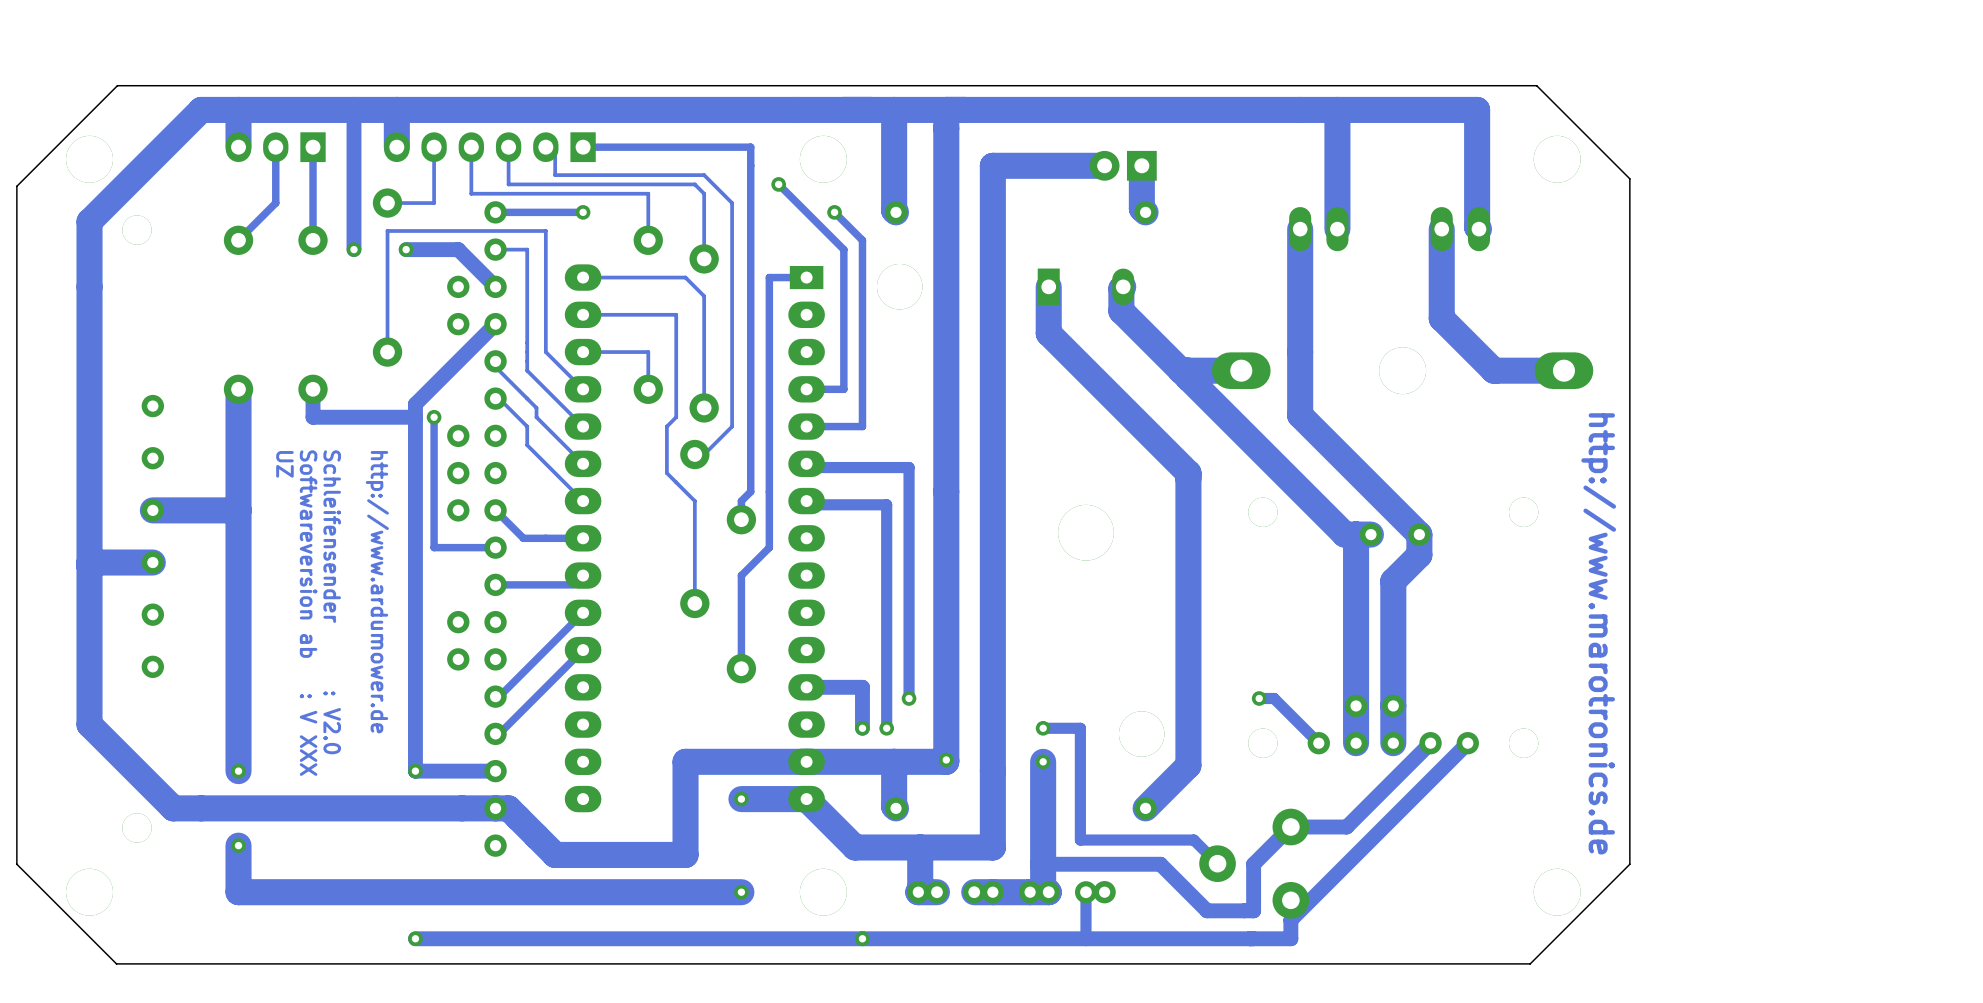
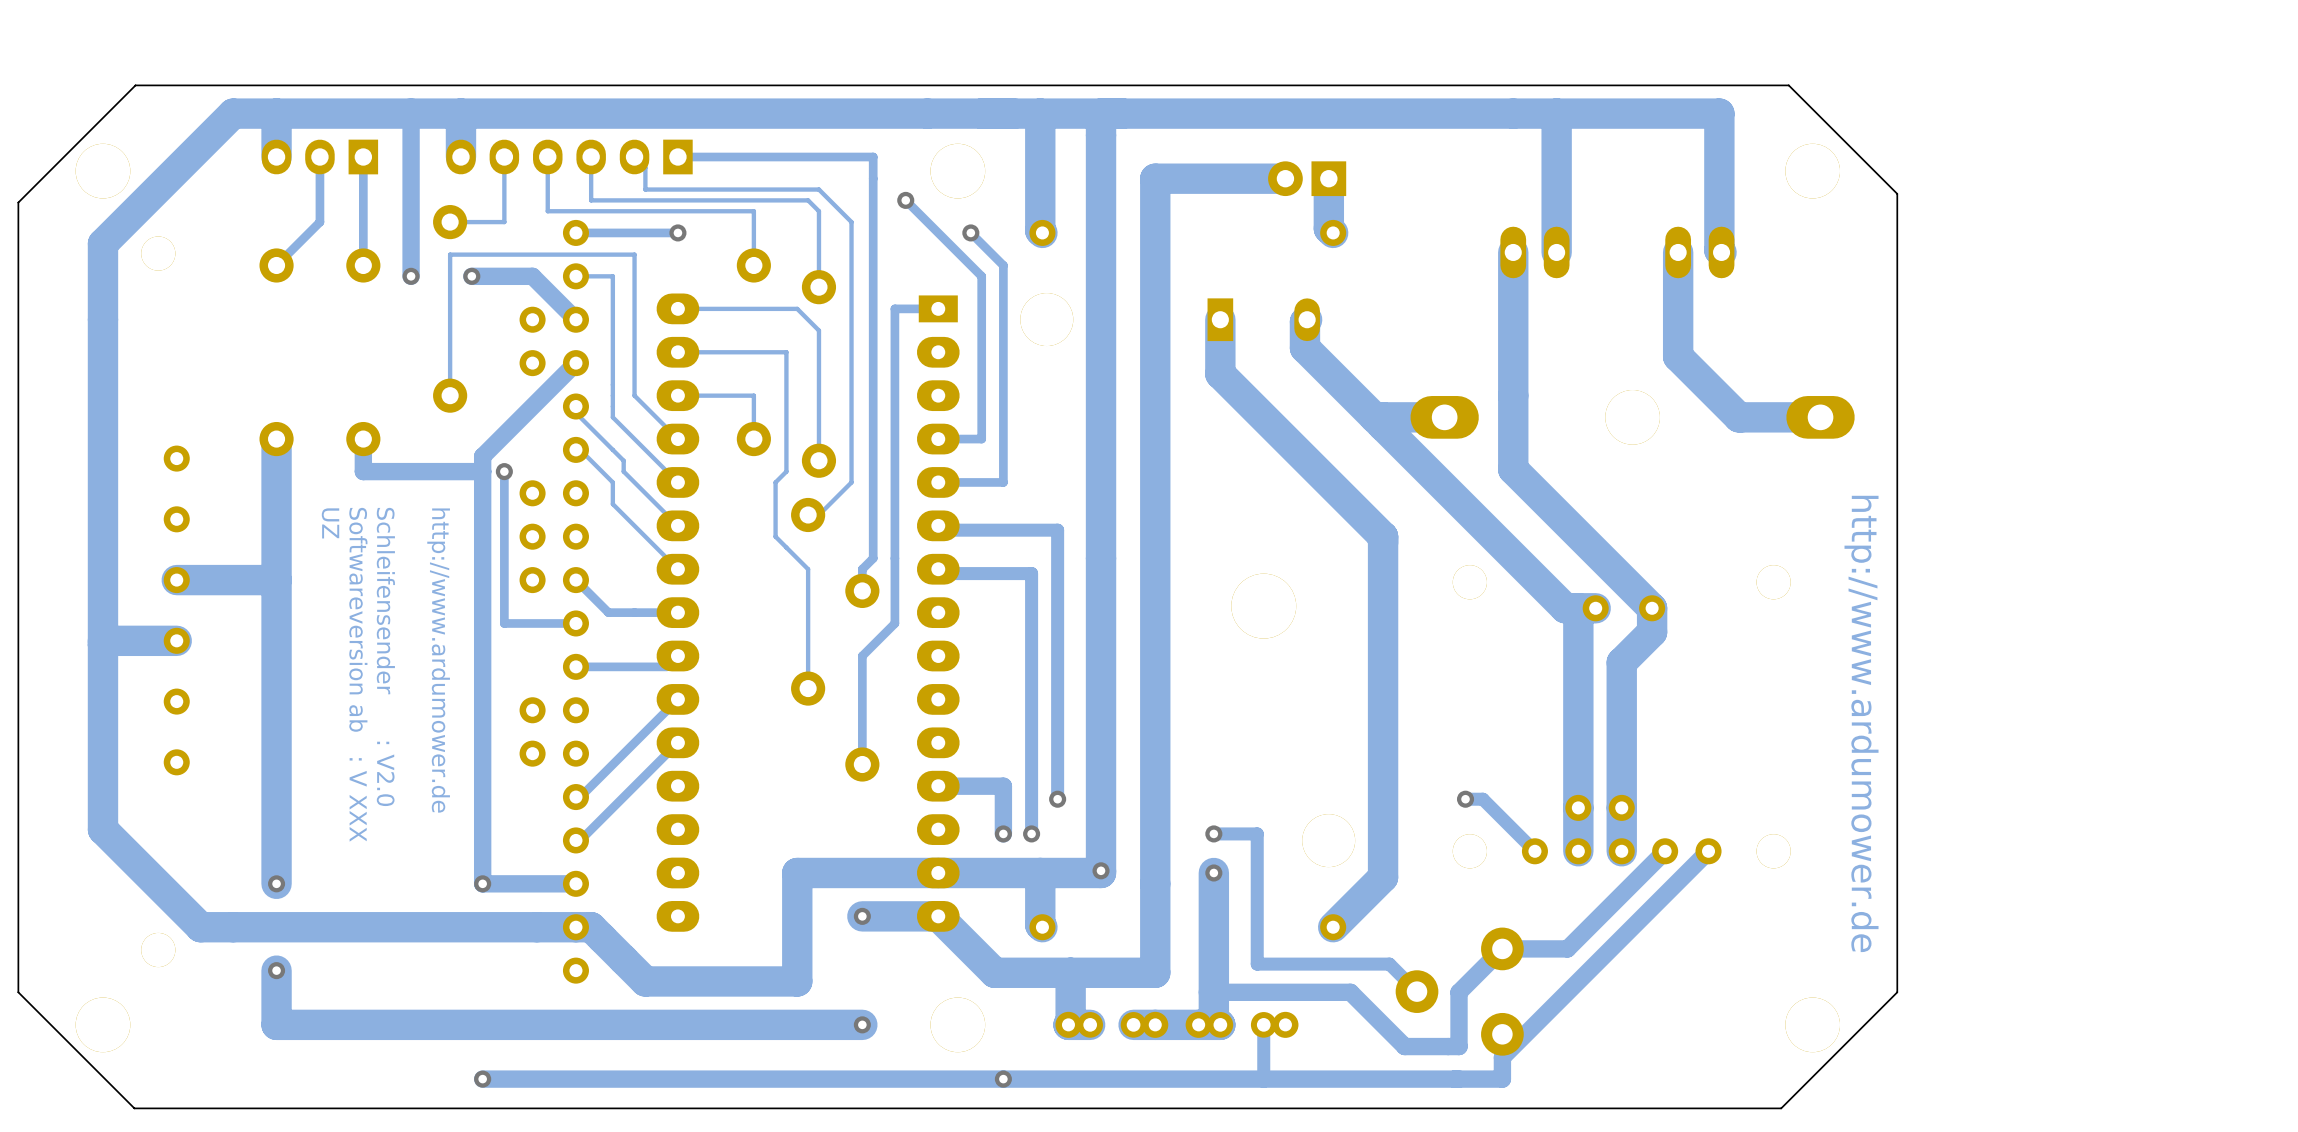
text: http://www.marotronics.de (1598, 633) -> http://www.ardumower.de (1861, 723)

